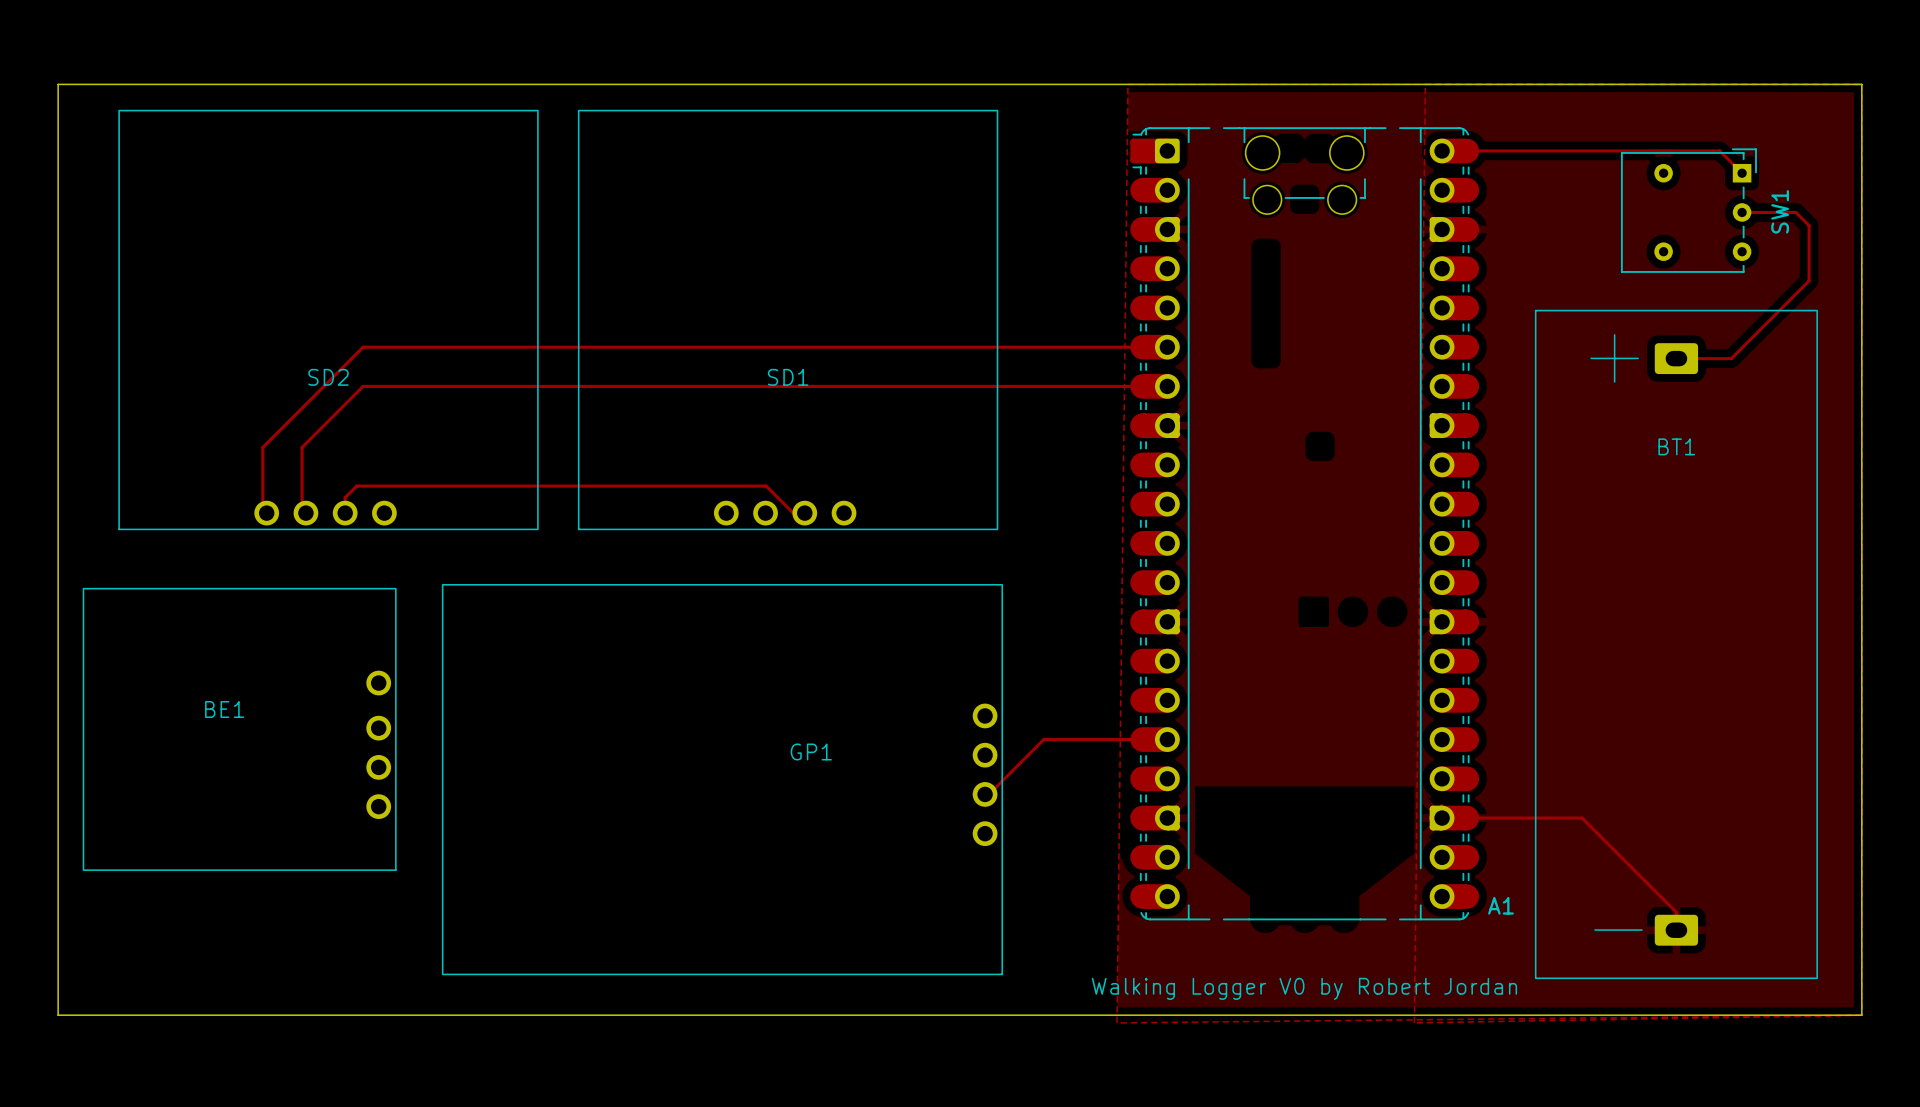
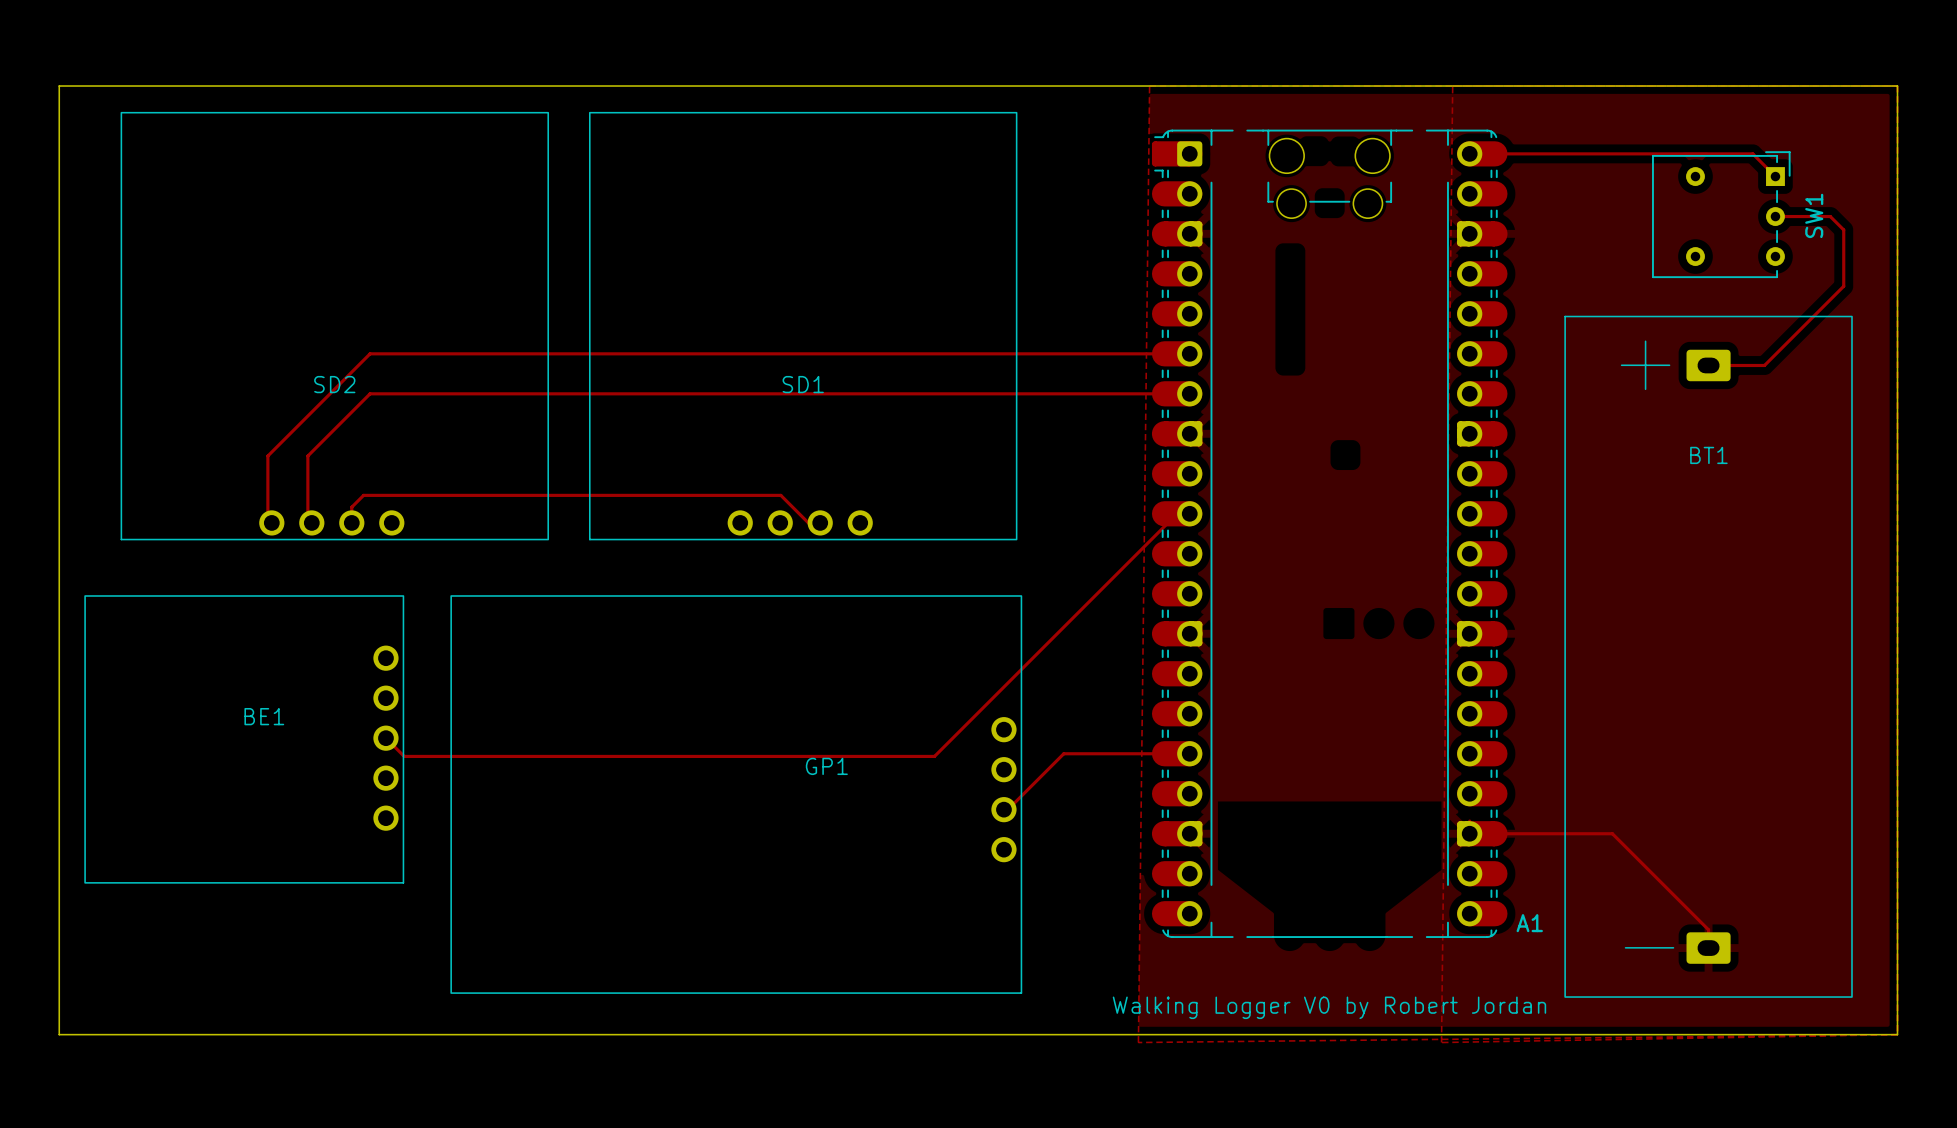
track: none -> (1177, 513) (934, 756) (404, 756) (387, 739)
BE1 footprint: [82, 587, 397, 871] -> [84, 595, 405, 884]
BE1 name position: BE1 (224, 709) -> BE1 (264, 716)

